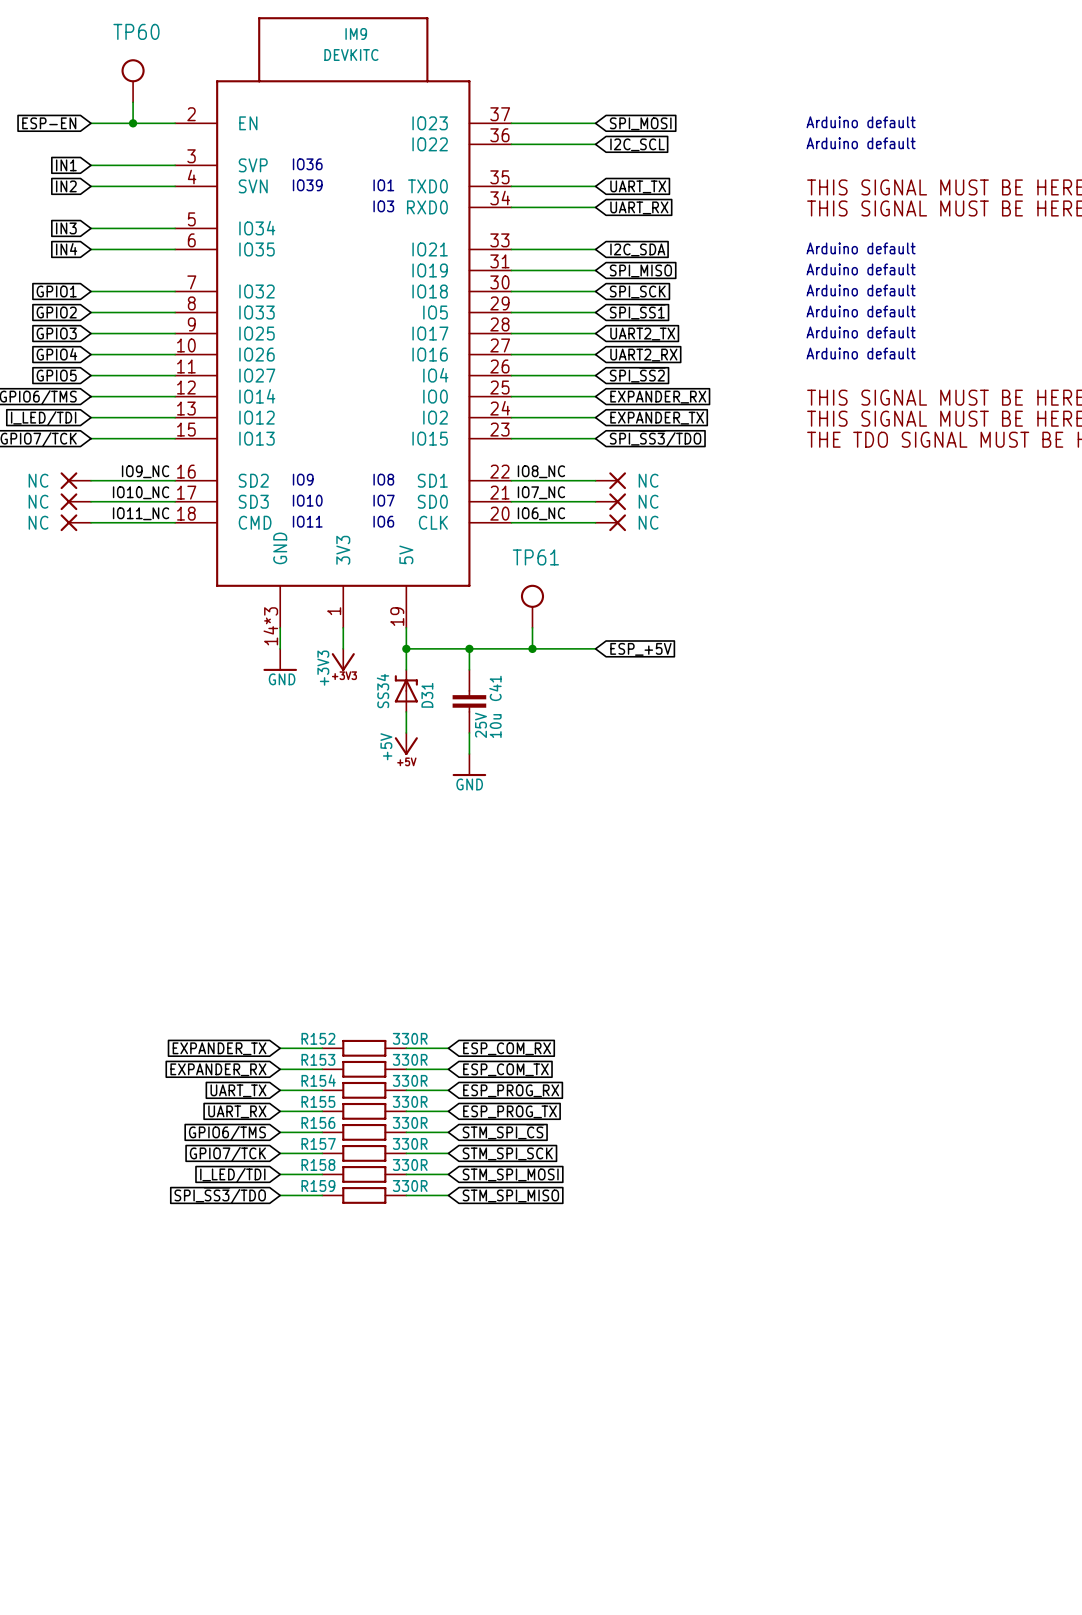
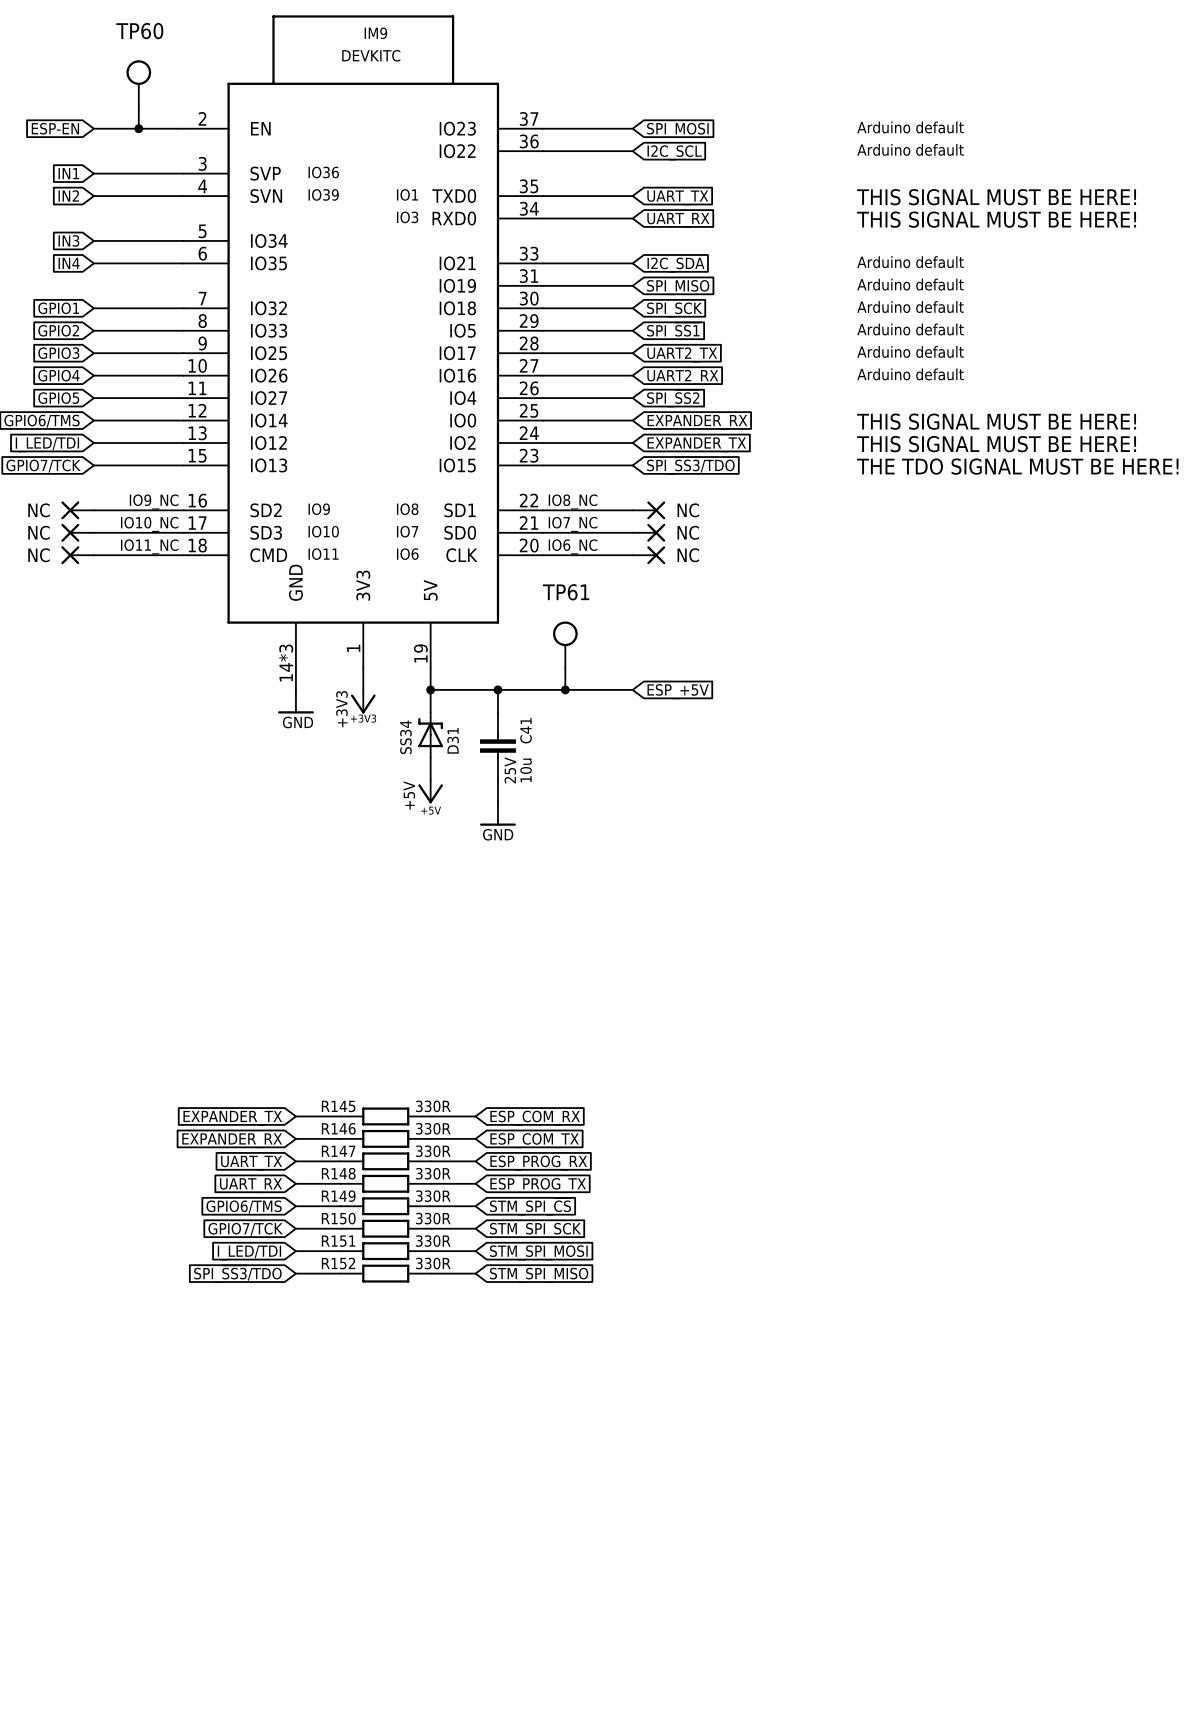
R152 name: R152 (318, 1038) -> R145 (338, 1106)
R153 name: R153 (318, 1059) -> R146 (338, 1128)
R154 name: R154 (318, 1080) -> R147 (338, 1151)
R155 name: R155 (318, 1101) -> R148 (338, 1173)
R156 name: R156 (318, 1122) -> R149 (338, 1196)
R157 name: R157 (318, 1143) -> R150 (338, 1218)
R158 name: R158 (318, 1164) -> R151 (338, 1241)
R159 name: R159 (318, 1186) -> R152 (338, 1263)

